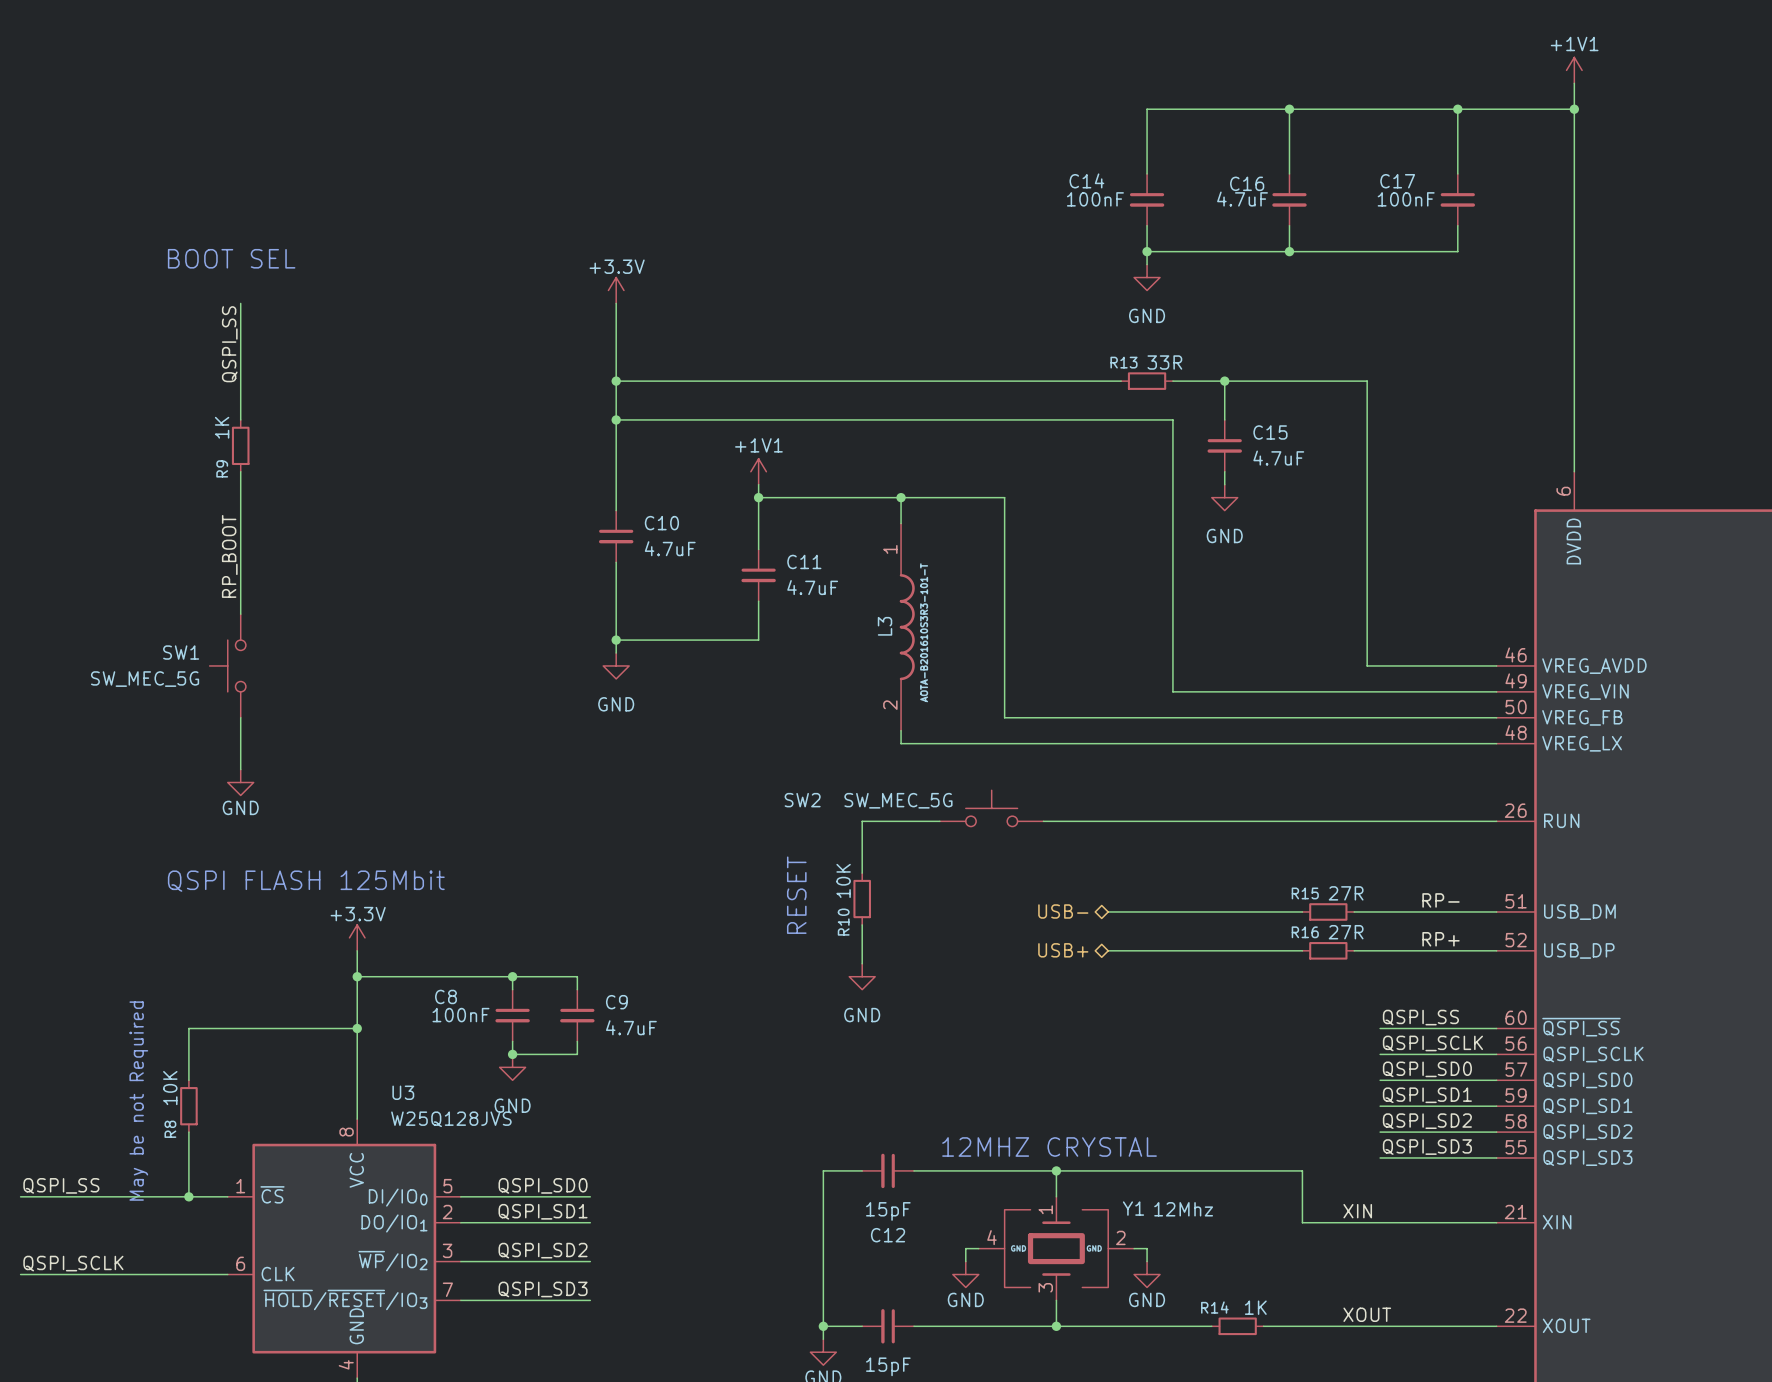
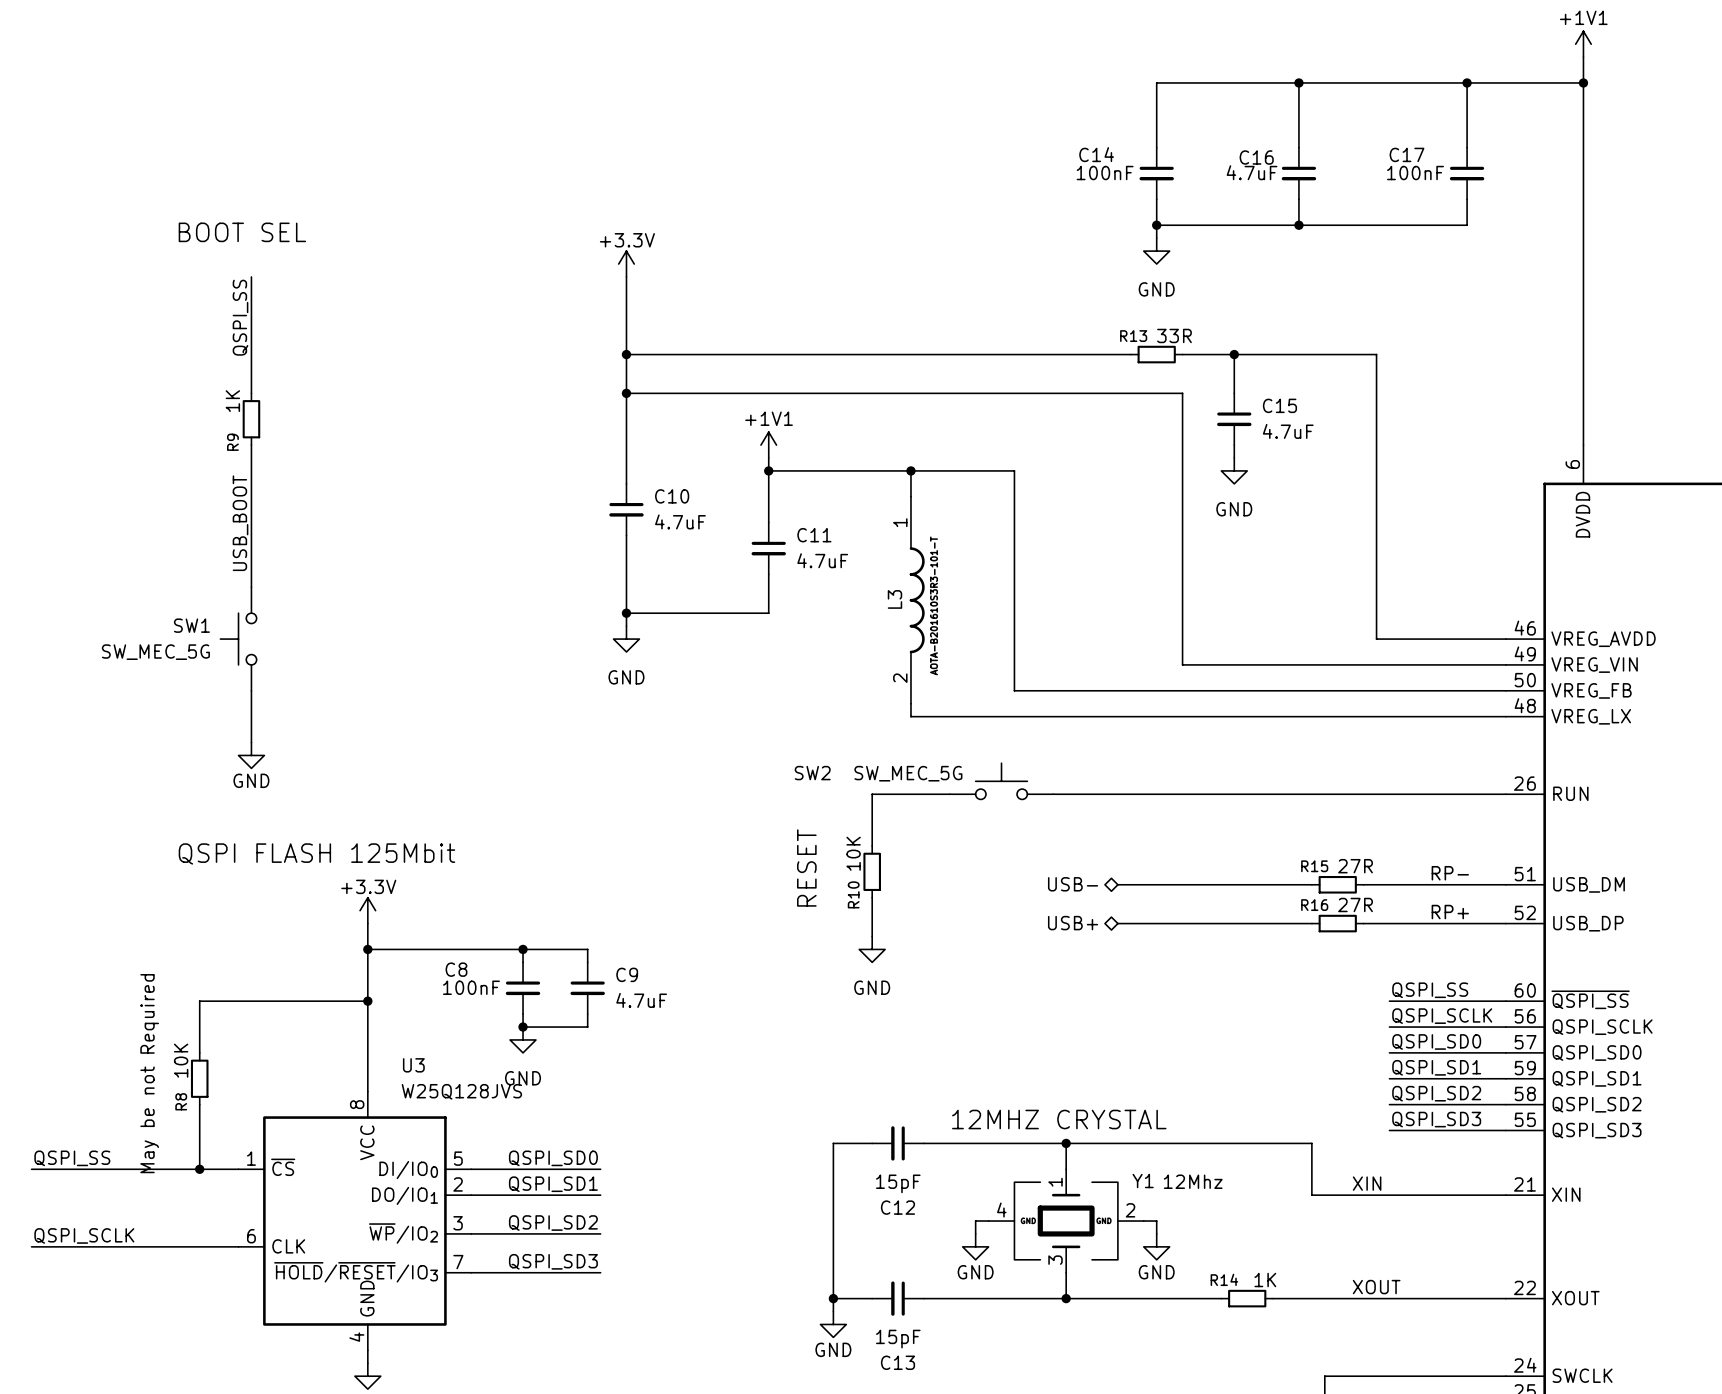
label: RP_BOOT (229, 556) -> USB_BOOT (240, 523)

